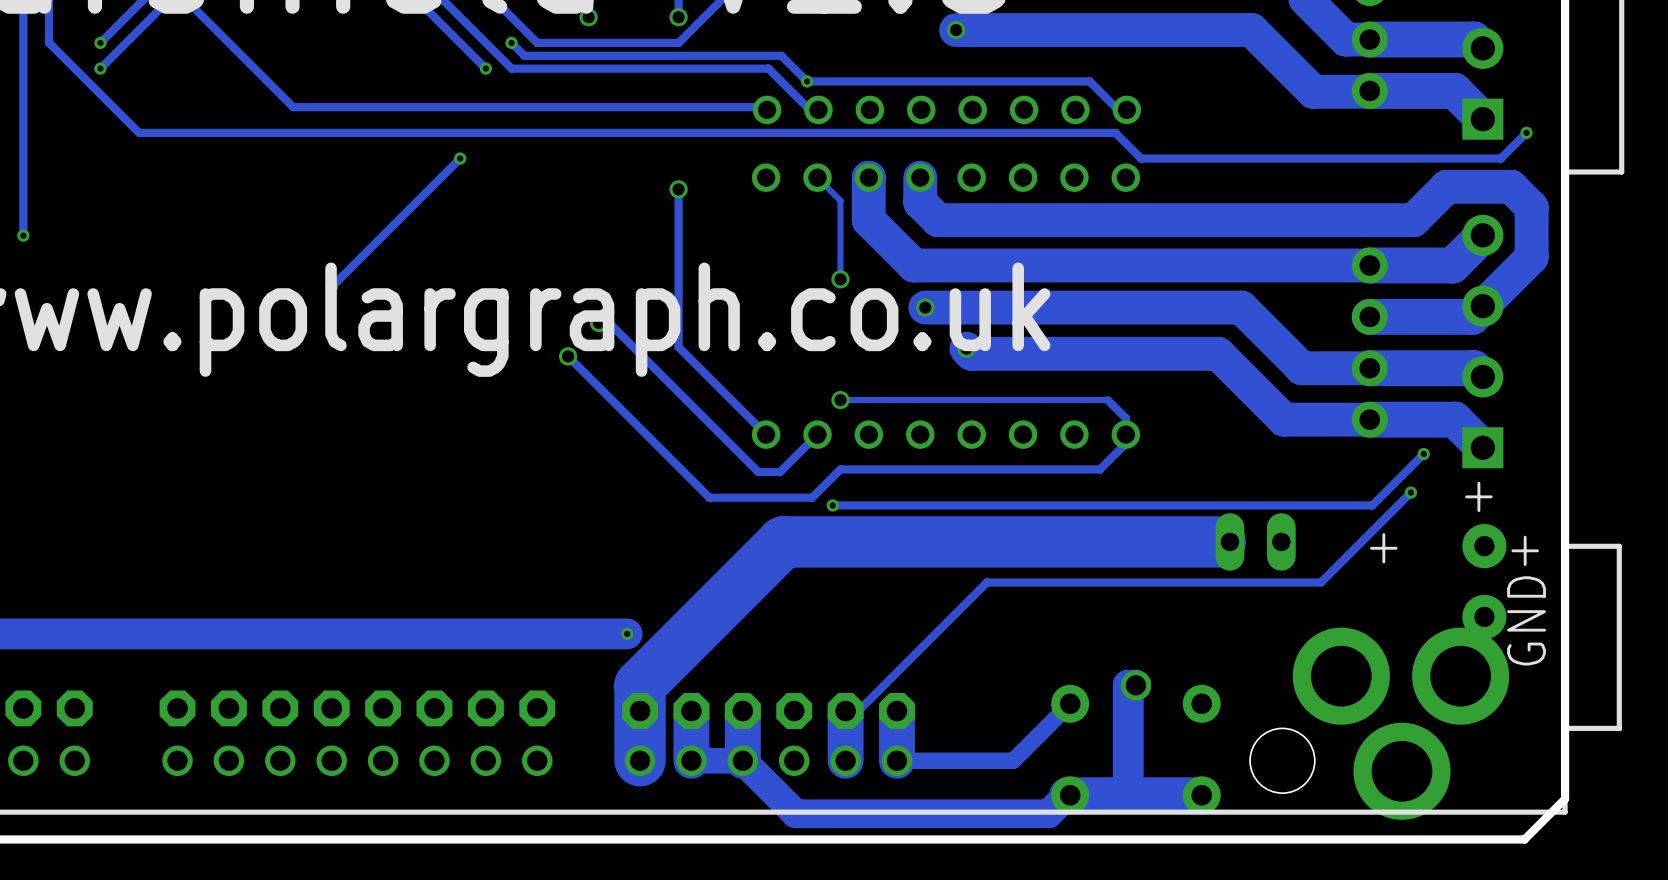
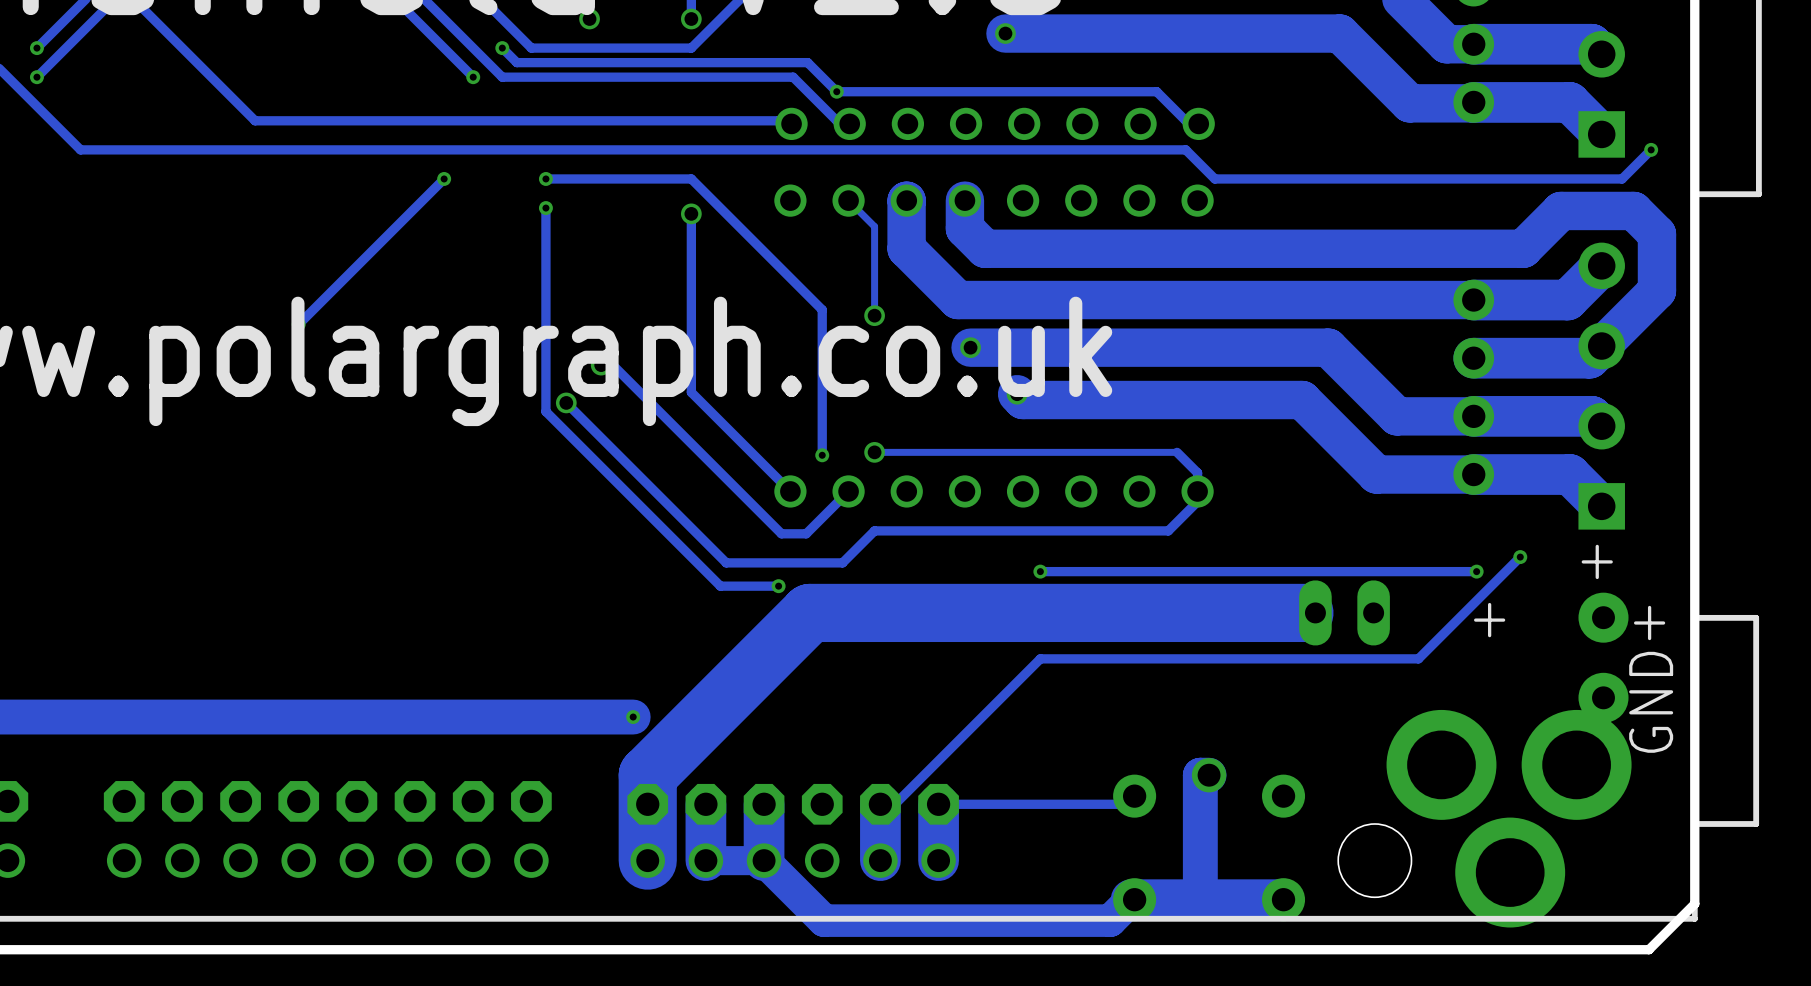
track: none -> (545, 178) (691, 178) (822, 309) (822, 455)
via: none -> (545, 178)
track: none -> (545, 208) (545, 411) (720, 586) (778, 586)
via: none -> (545, 208)
via: none -> (822, 455)
track: (1423, 454) (1372, 505) -> none
via position: (1423, 454) -> (1476, 571)
via: (832, 505) -> none
track: (986, 505) (832, 505) -> none
via: none -> (1040, 571)
via: none -> (778, 586)
track: (1070, 703) (1013, 760) (897, 760) -> (1134, 796) (1127, 804) (938, 804)

